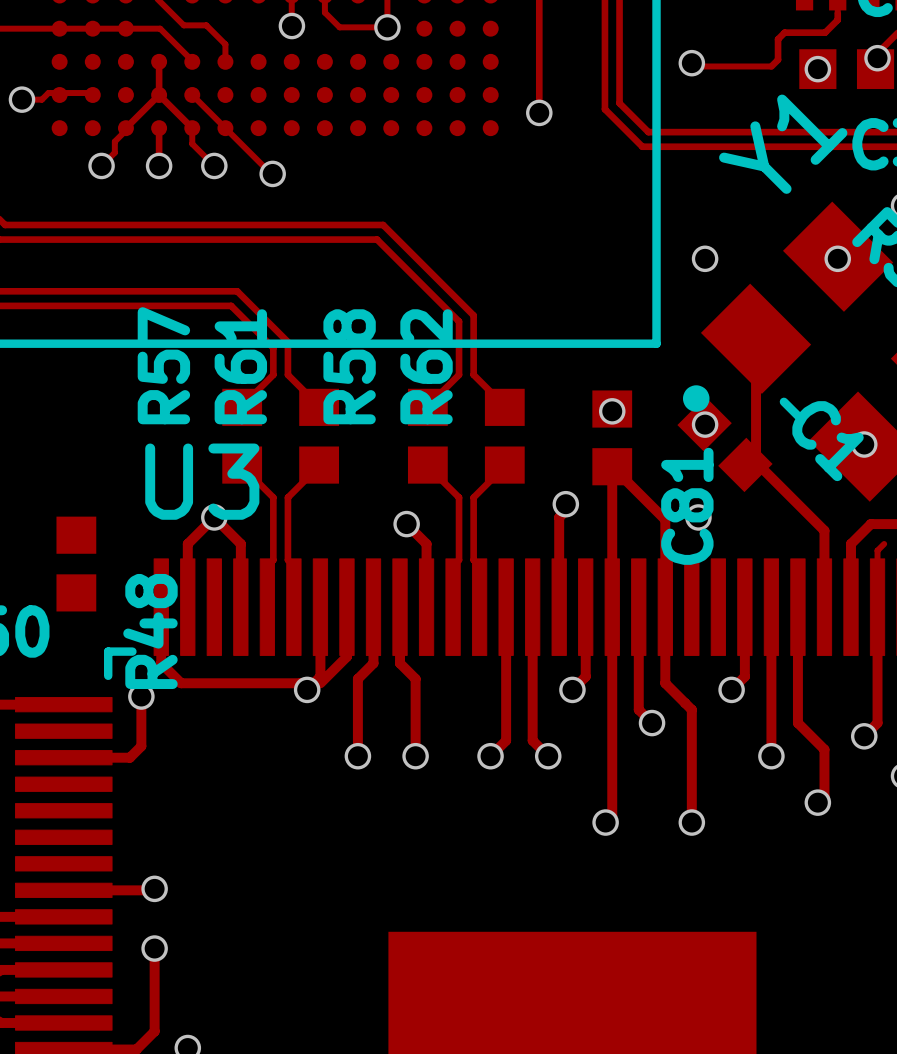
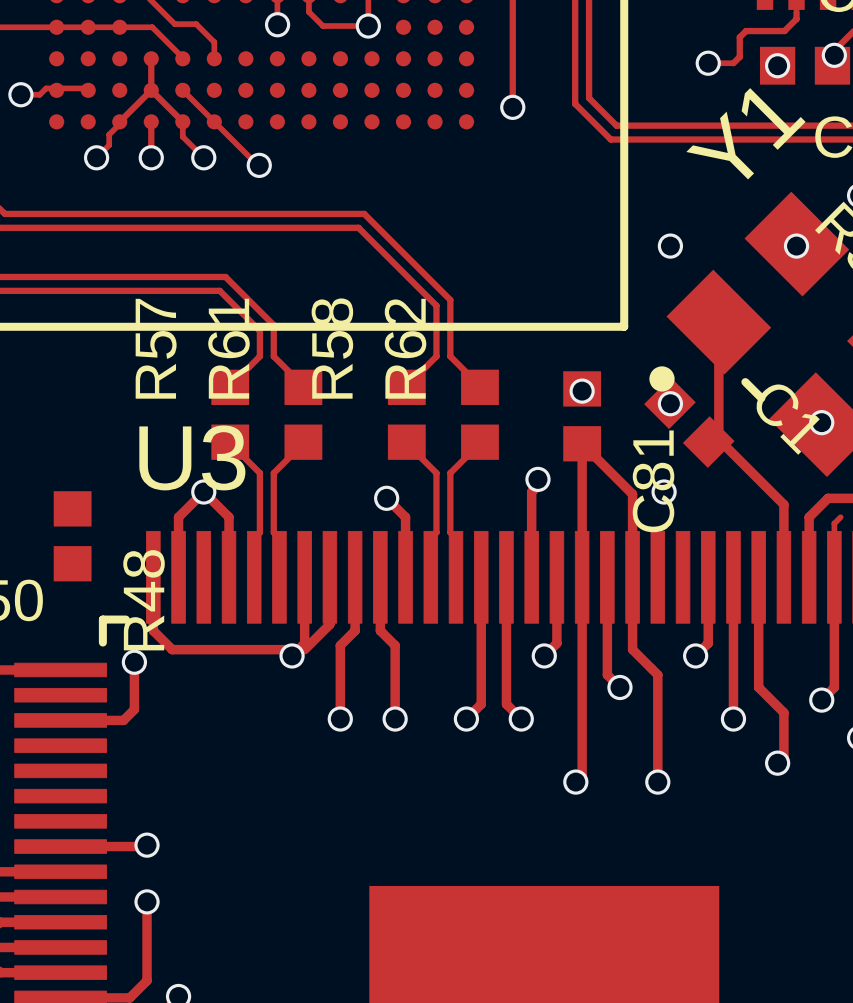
track: (691, 63) (695, 66) (744, 66) -> none
via position: (691, 63) -> (708, 63)

